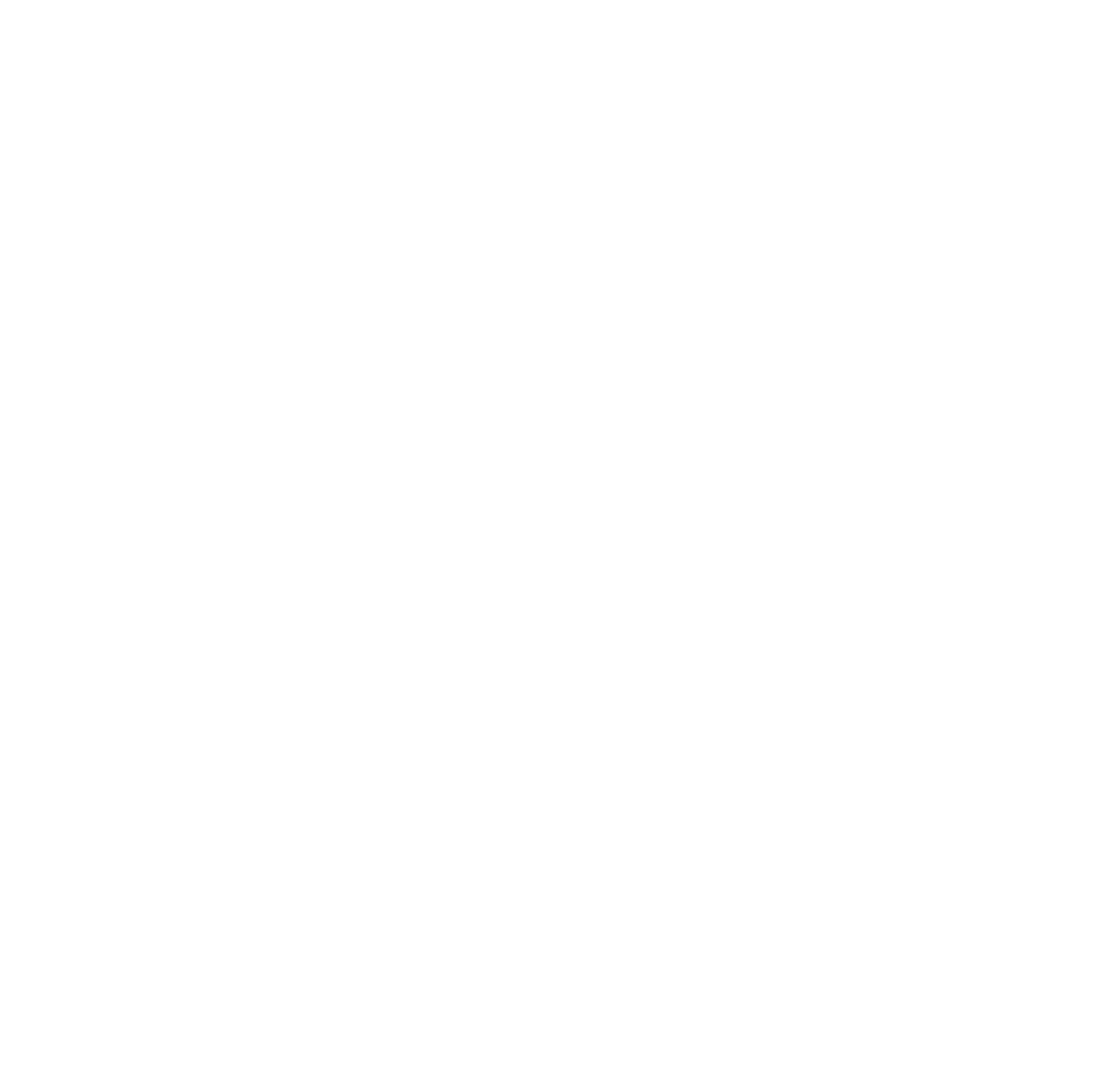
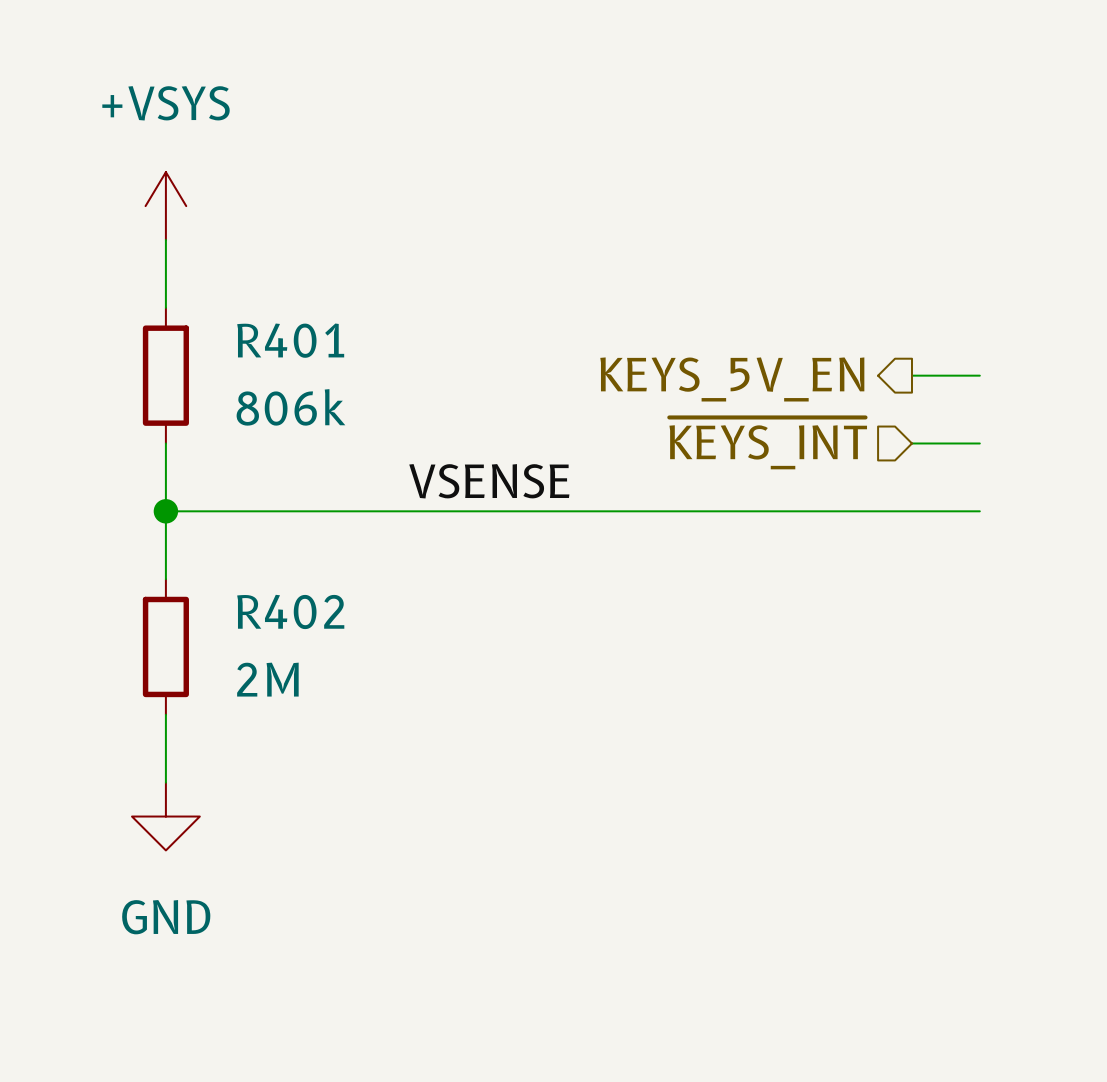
power symbol: none -> +VSYS (165, 206)
wire: none -> (165, 240) (165, 307)
R401: none -> 806k (165, 375)
wire: none -> (911, 375) (979, 375)
hierarchical label: none -> KEYS_5V_EN (732, 379)
hierarchical label: none -> ~{KEYS_INT} (768, 443)
wire: none -> (165, 443) (165, 579)
wire: none -> (911, 443) (979, 443)
label: none -> VSENSE (489, 481)
wire: none -> (165, 511) (979, 511)
junction: none -> (165, 511)
R402: none -> 2M (165, 646)
wire: none -> (165, 714) (165, 782)
power symbol: none -> GND (165, 816)

